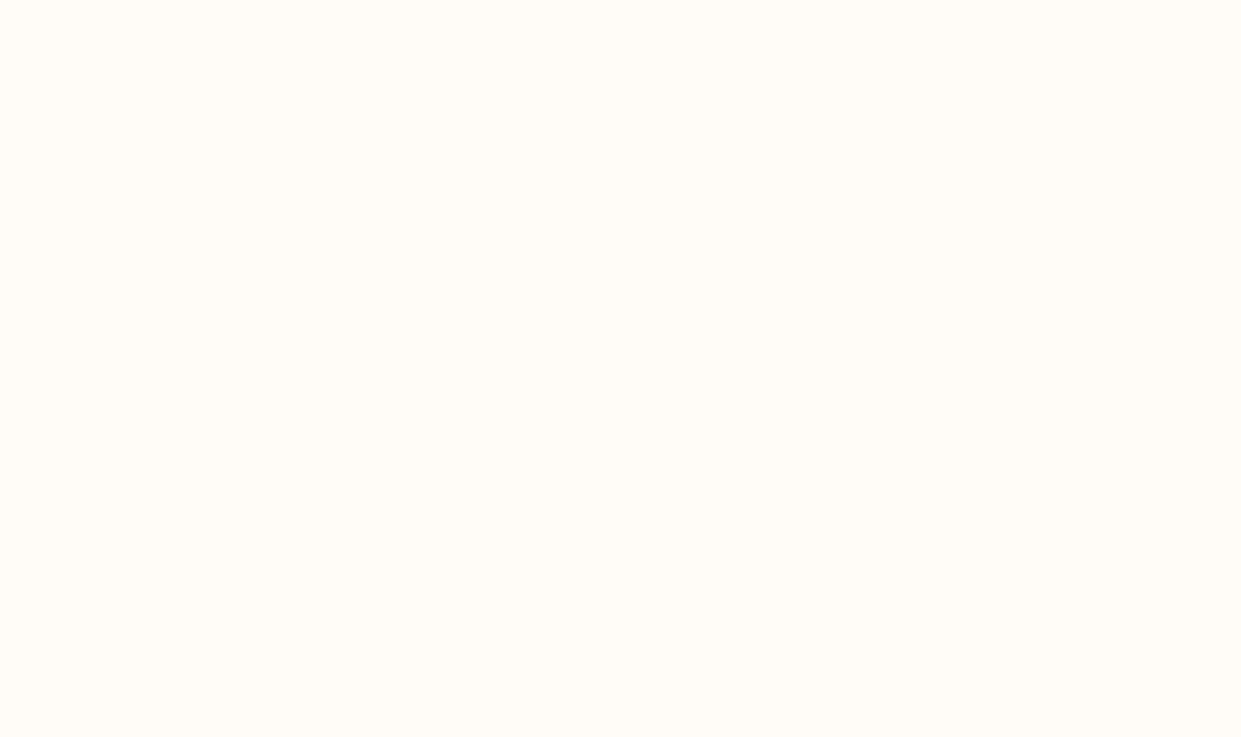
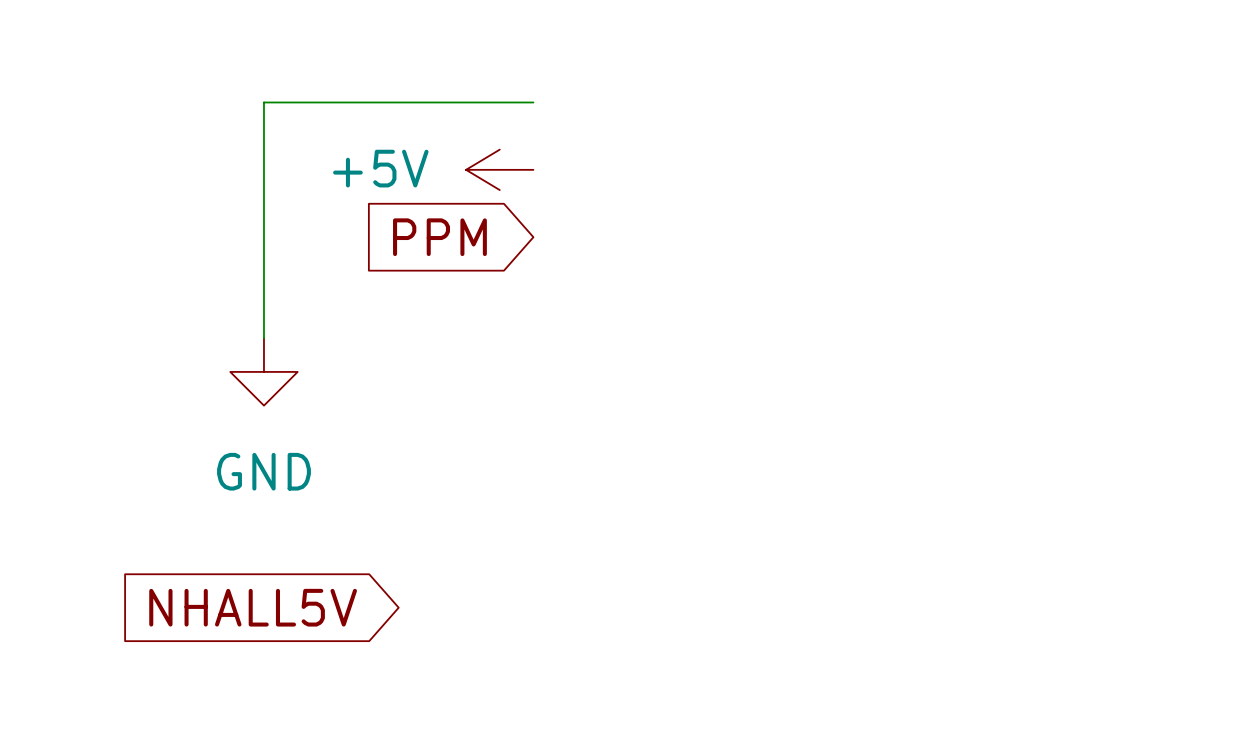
wire: none -> (533, 102) (263, 102) (263, 338)
power symbol: none -> +5V (499, 169)
global label: none -> PPM (439, 237)
power symbol: none -> GND (263, 371)
global label: none -> NHALL5V (253, 607)

